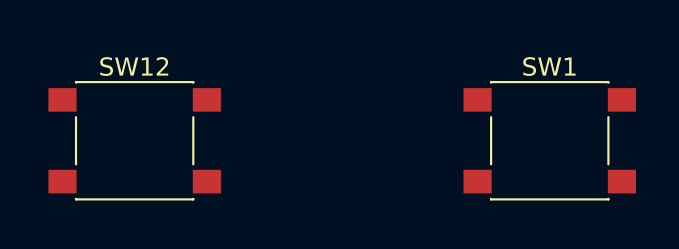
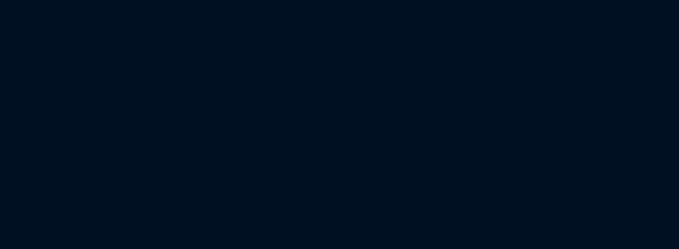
SW12: (134, 140) -> none
SW1: (549, 140) -> none

